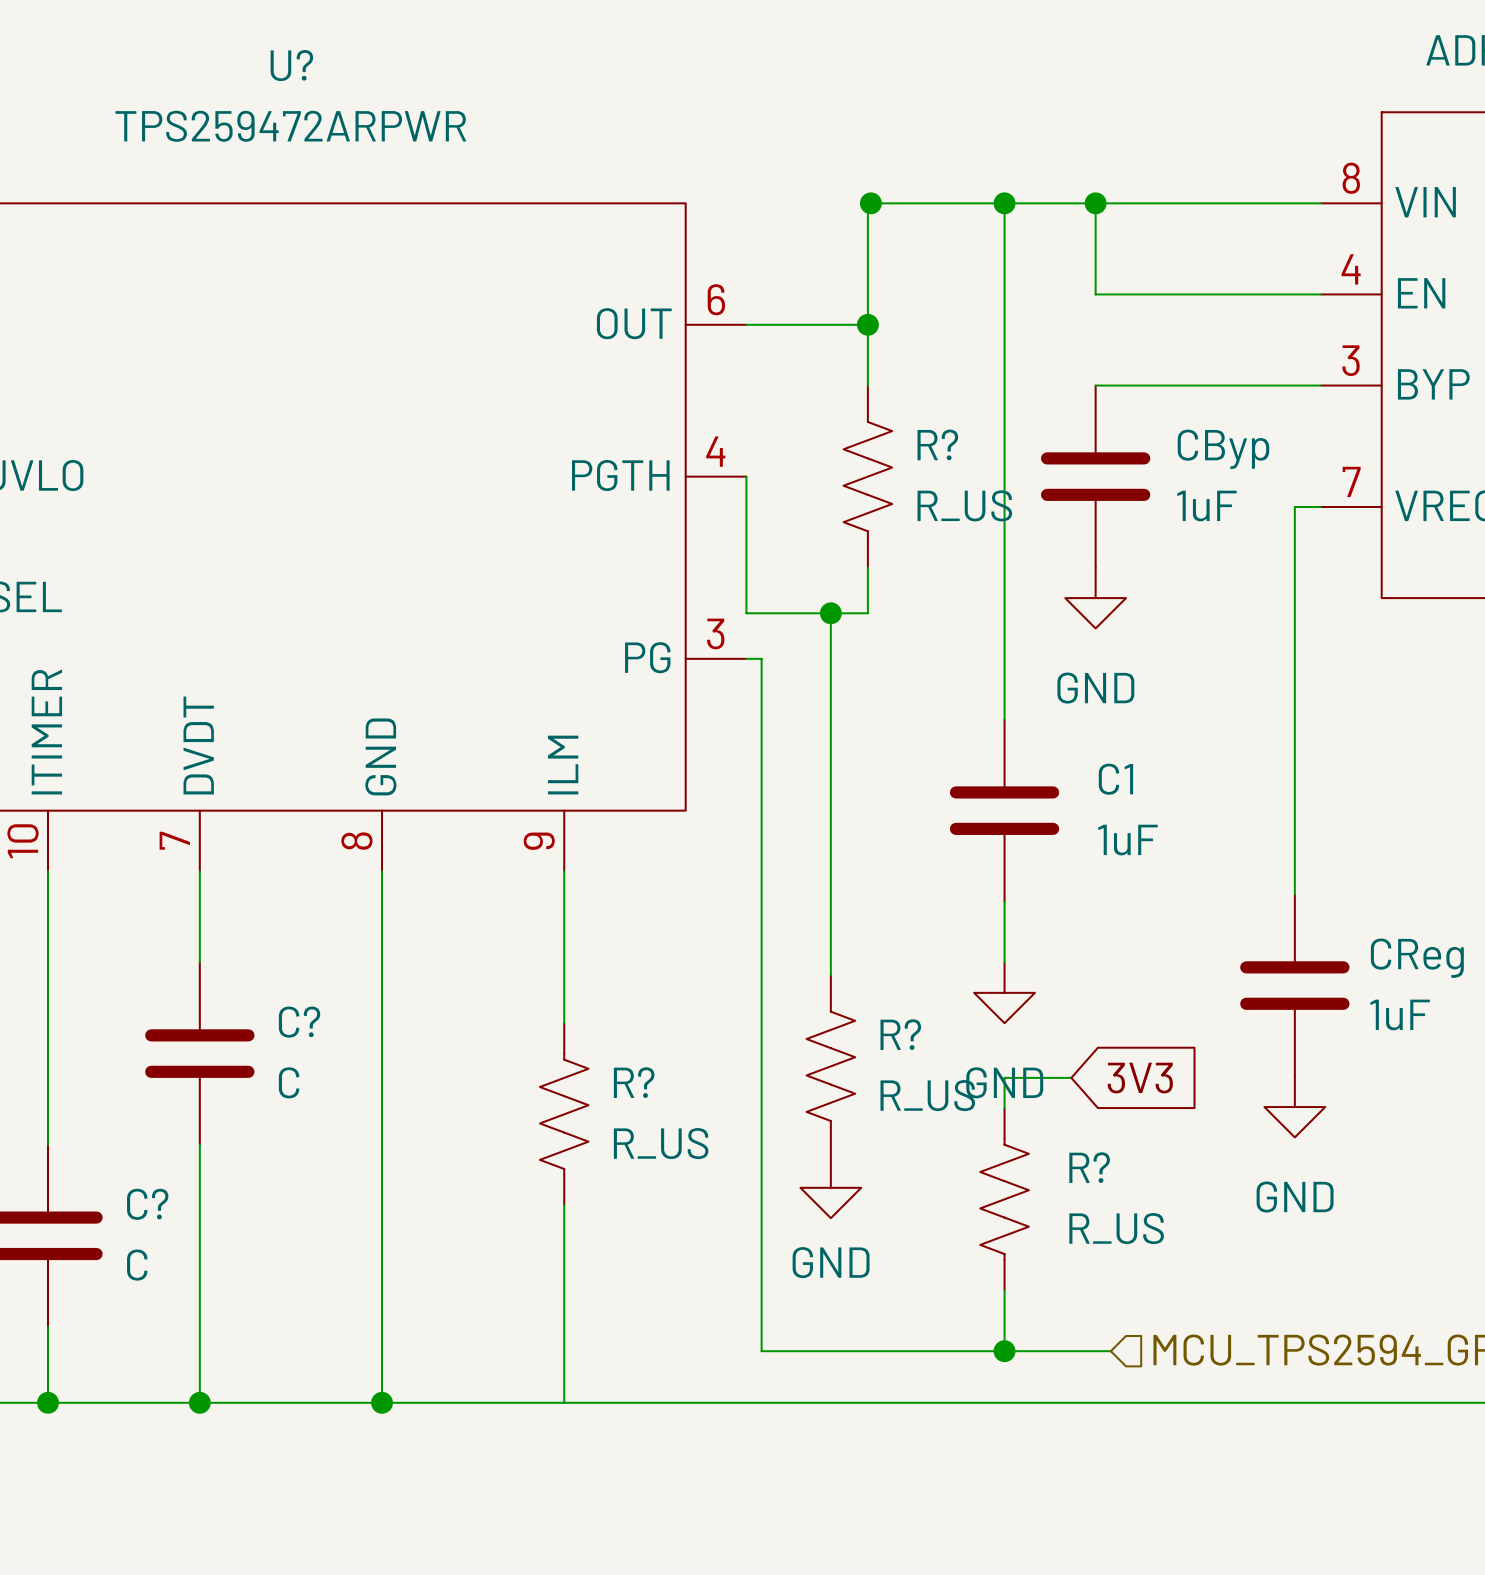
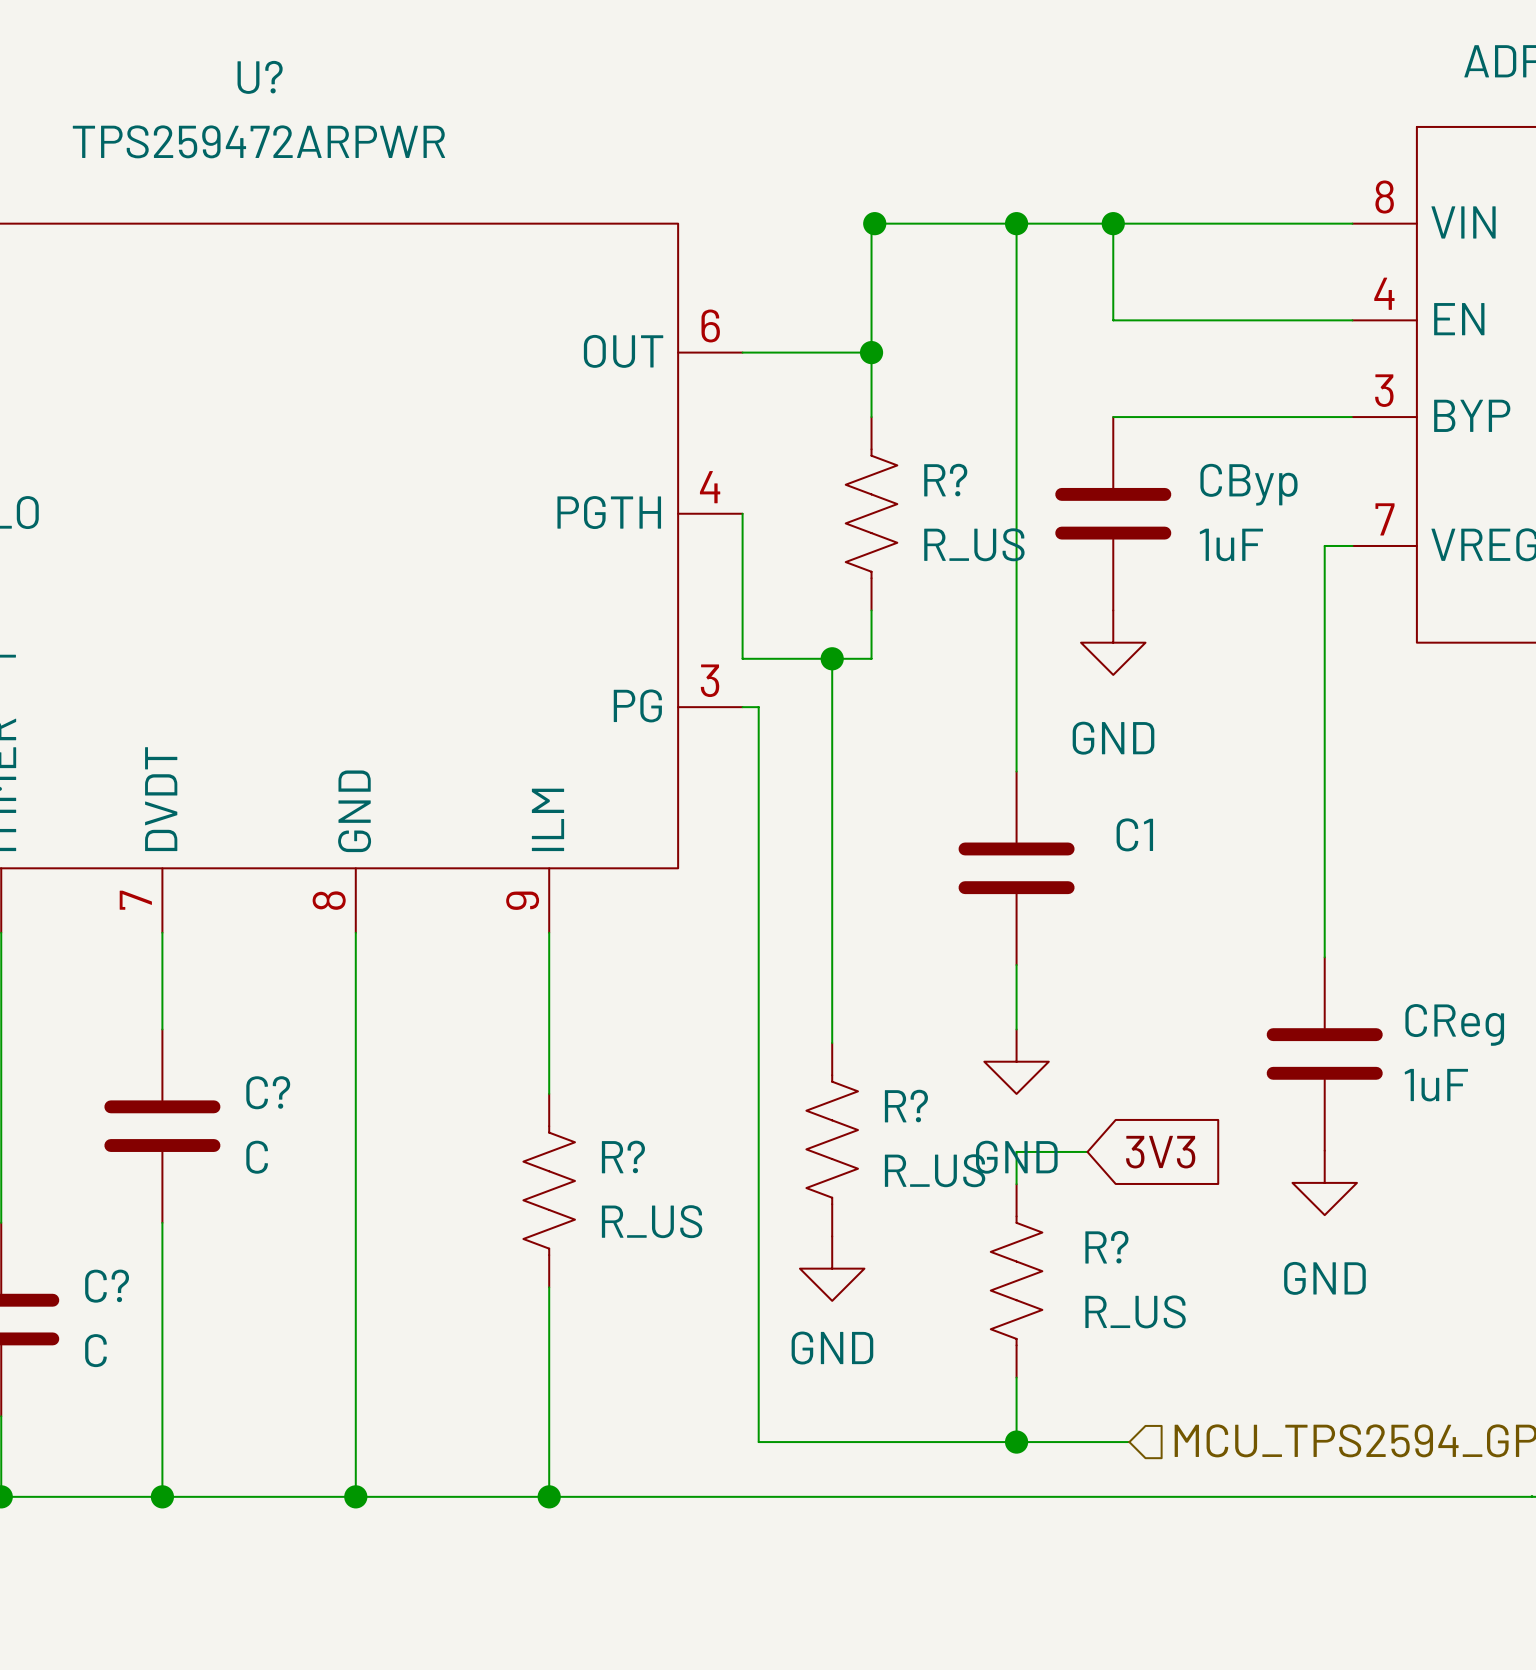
C1 value: 1uF (1127, 840) -> none
junction: none -> (549, 1496)

